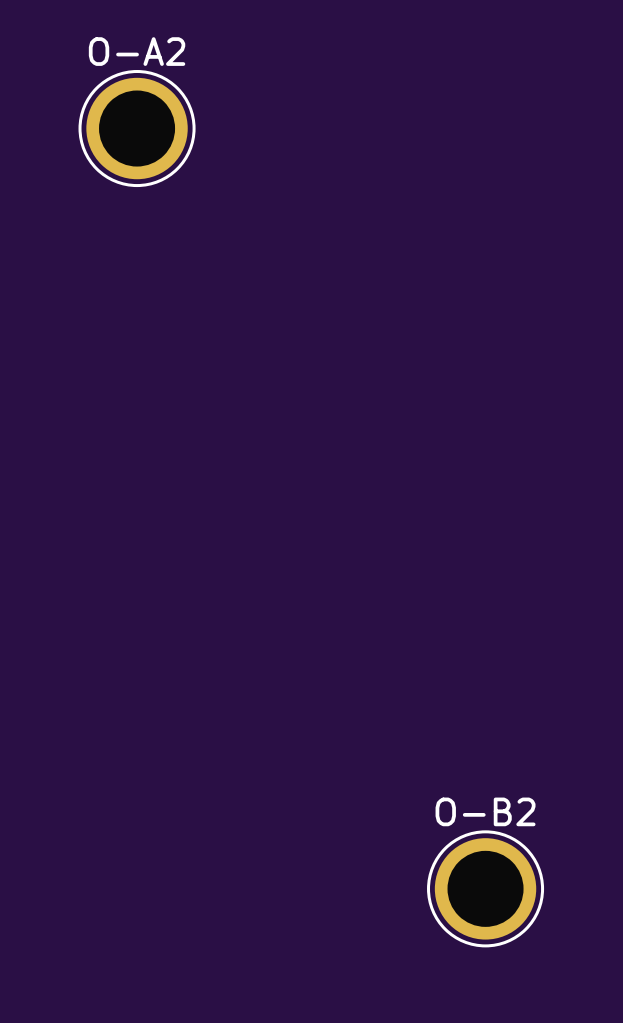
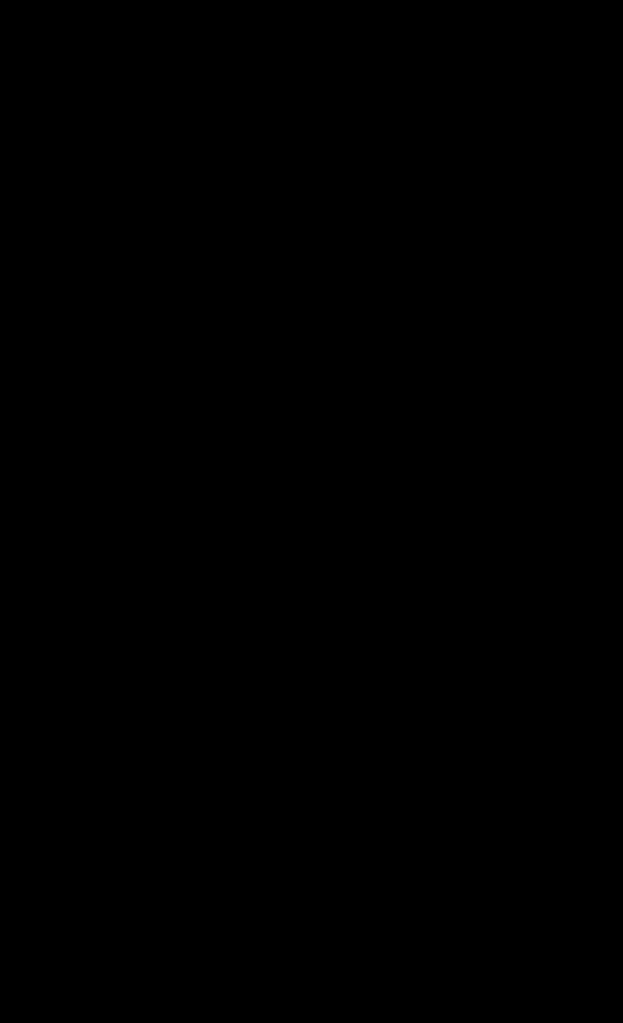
O-A2: (137, 128) -> none
O-B2: (485, 888) -> none

